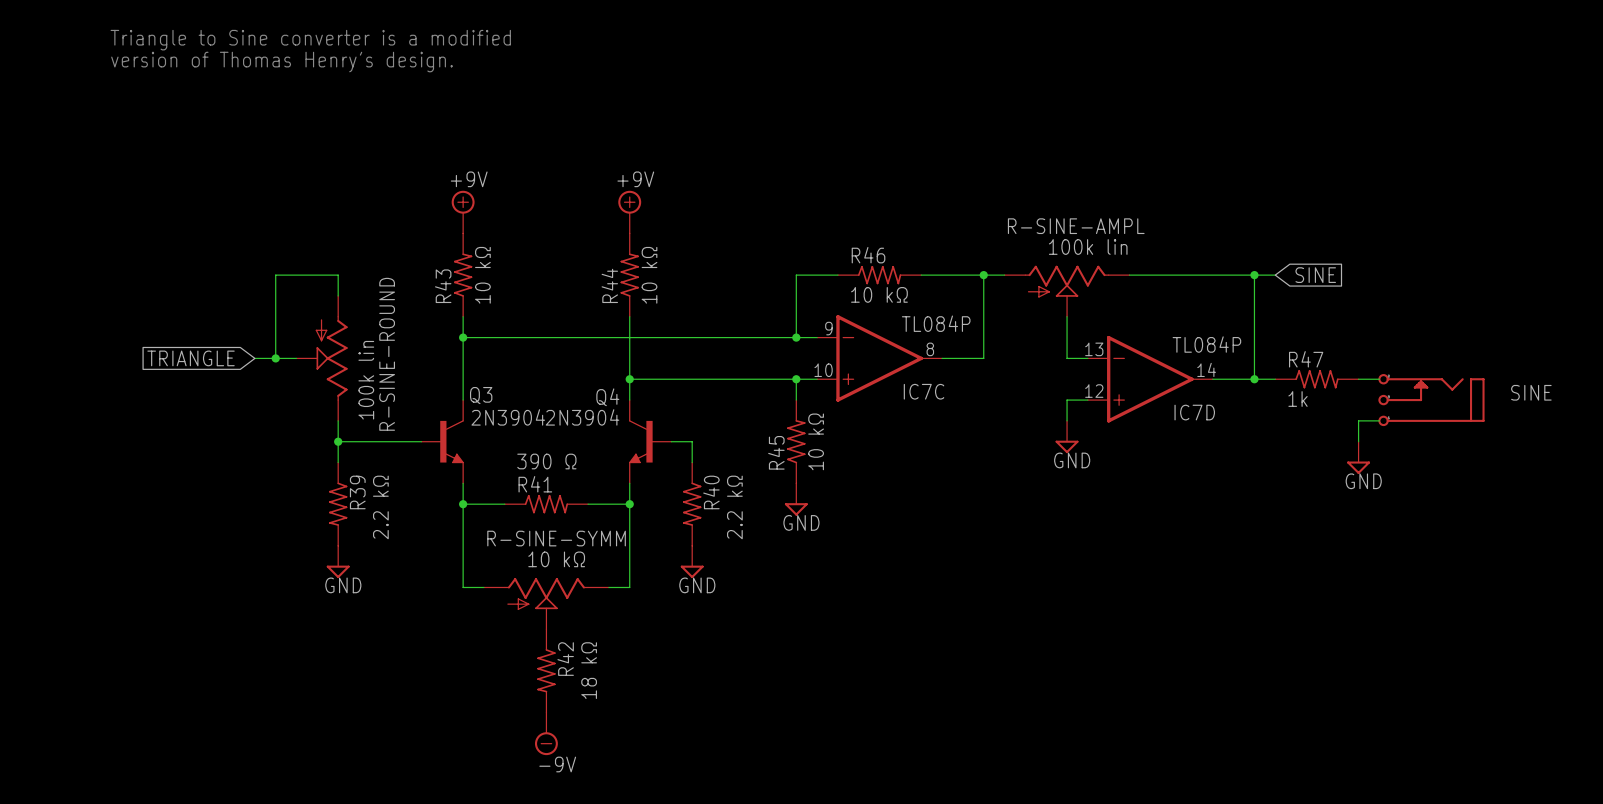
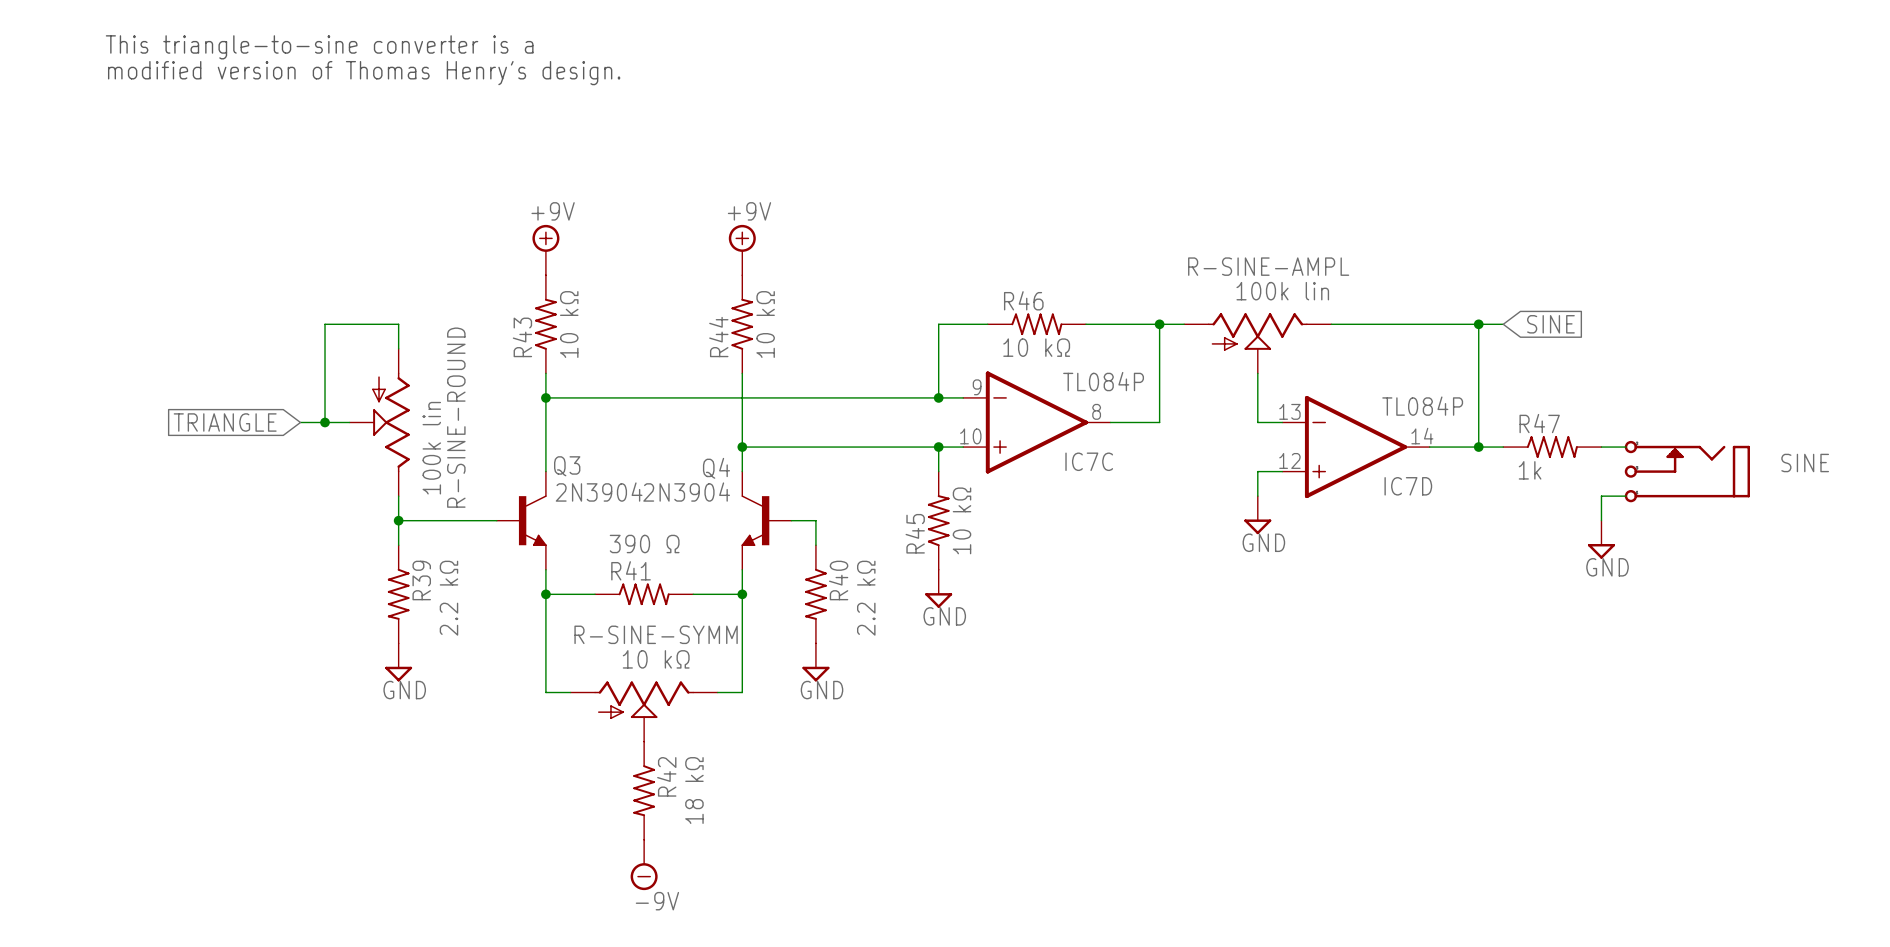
text: Triangle to Sine converter is a modified (310, 40) -> This triangle-to-sine converter is a (319, 47)
text: version of Thomas Henry's design. (282, 62) -> modified version of Thomas Henry's design. (364, 73)

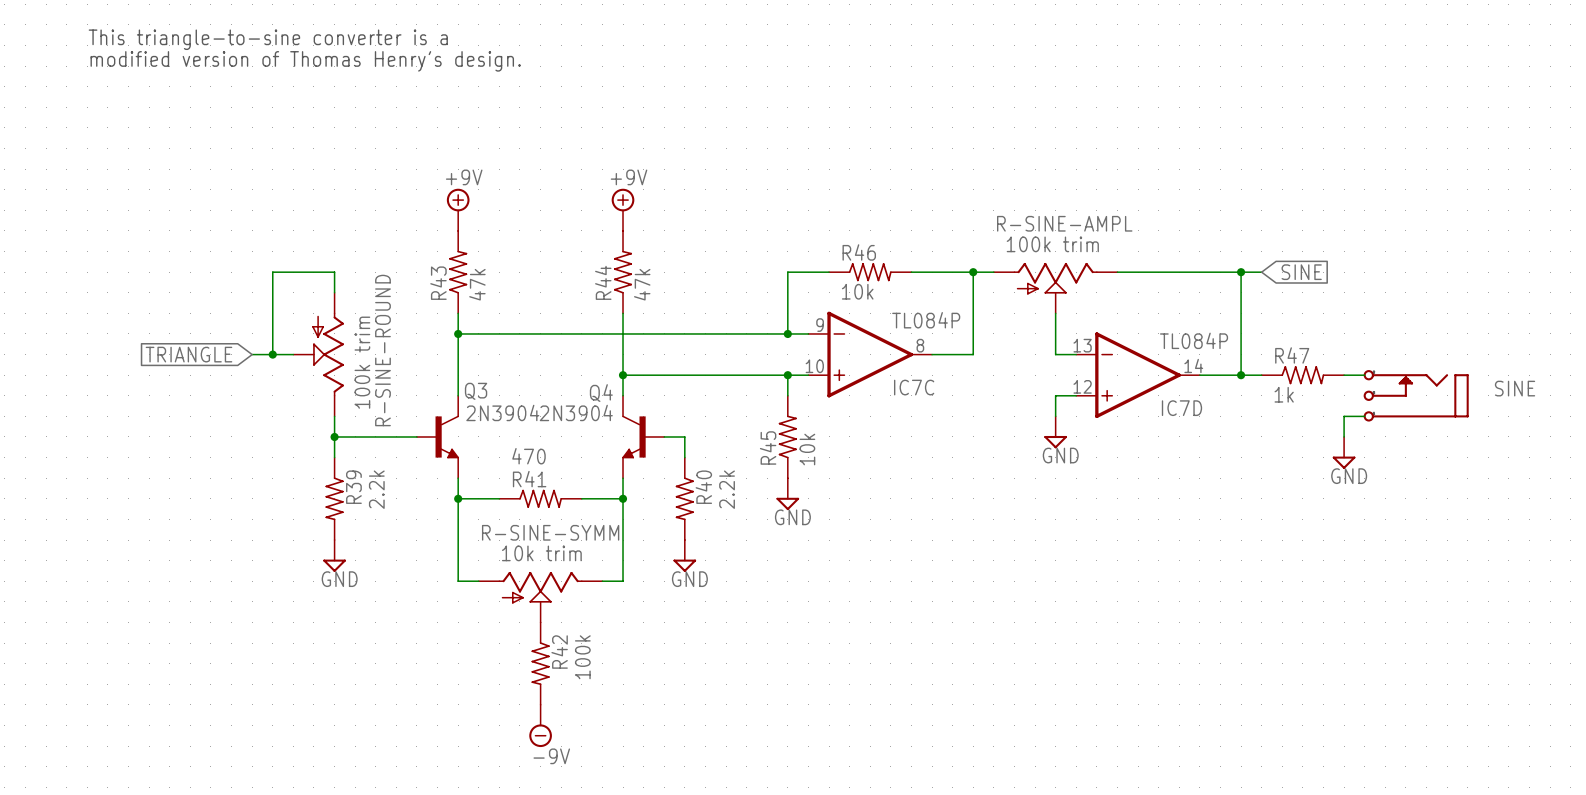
R-SINE-AMPL value: 100k lin (1282, 291) -> 100k trim (1052, 244)
R43 value: 10 kΩ (569, 324) -> 47k (477, 284)
R44 value: 10 kΩ (765, 324) -> 47k (642, 284)
R46 value: 10 kΩ (1036, 347) -> 10k (857, 291)
R-SINE-ROUND value: 100k lin (431, 448) -> 100k trim (362, 362)
R45 value: 10 kΩ (962, 520) -> 10k (807, 449)
R41 value: 390 Ω (644, 544) -> 470 (528, 456)
R39 value: 2.2 kΩ (448, 598) -> 2.2k (376, 489)
R40 value: 2.2 kΩ (866, 598) -> 2.2k (727, 489)
R-SINE-SYMM value: 10 kΩ (656, 659) -> 10k trim (541, 553)
R42 value: 18 kΩ (694, 790) -> 100k (582, 657)

